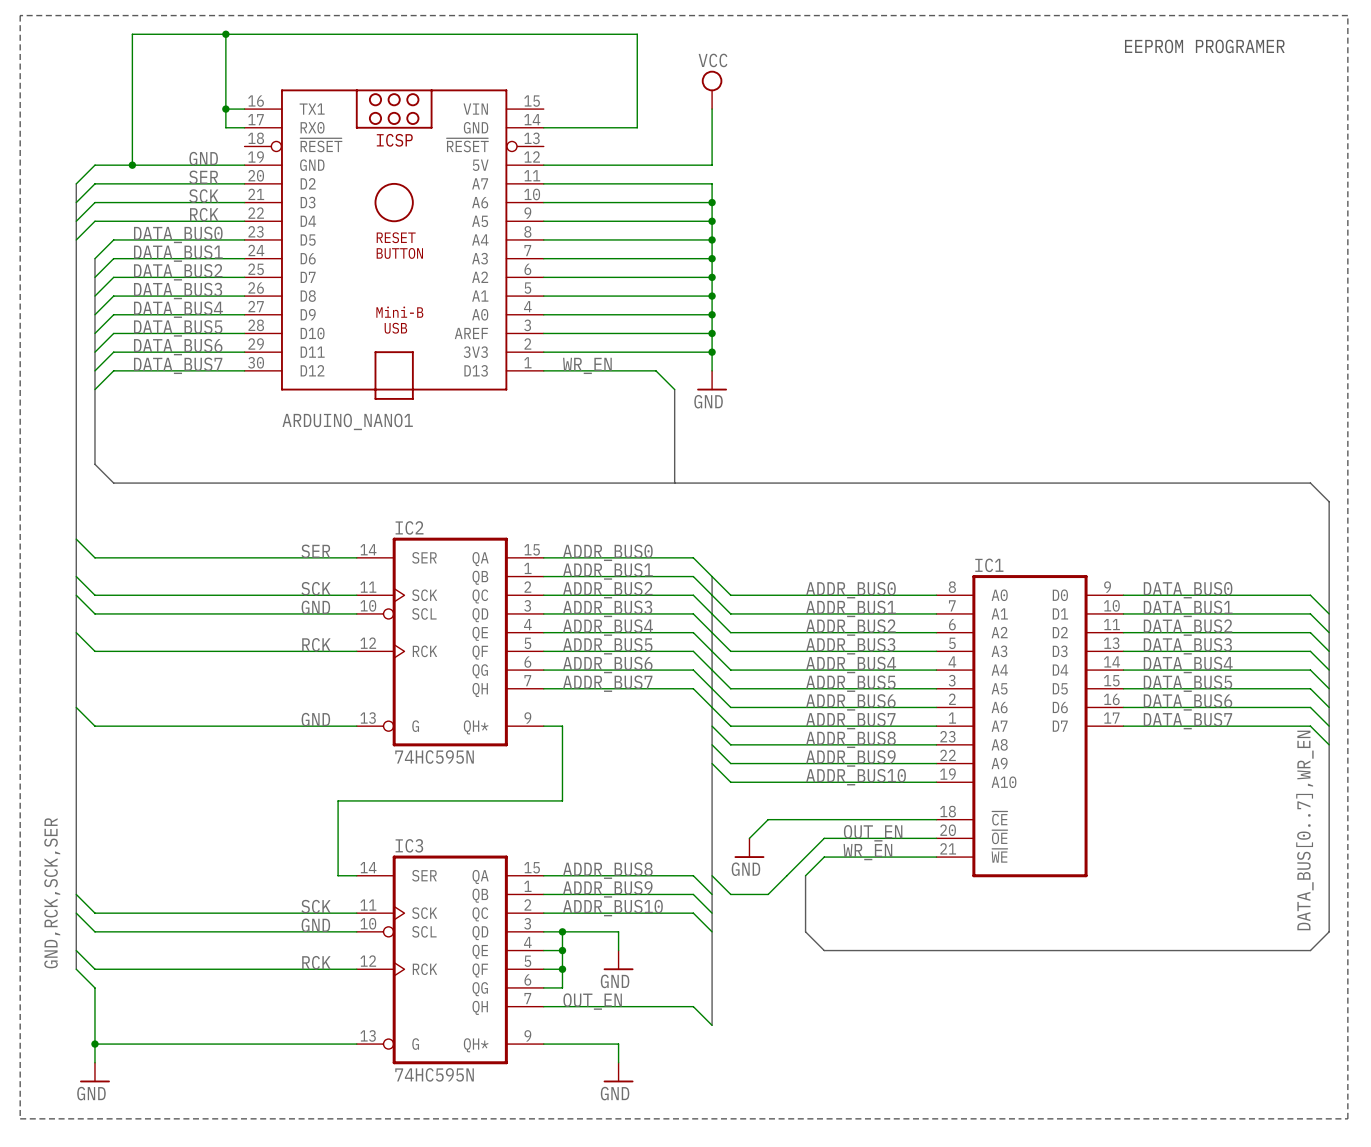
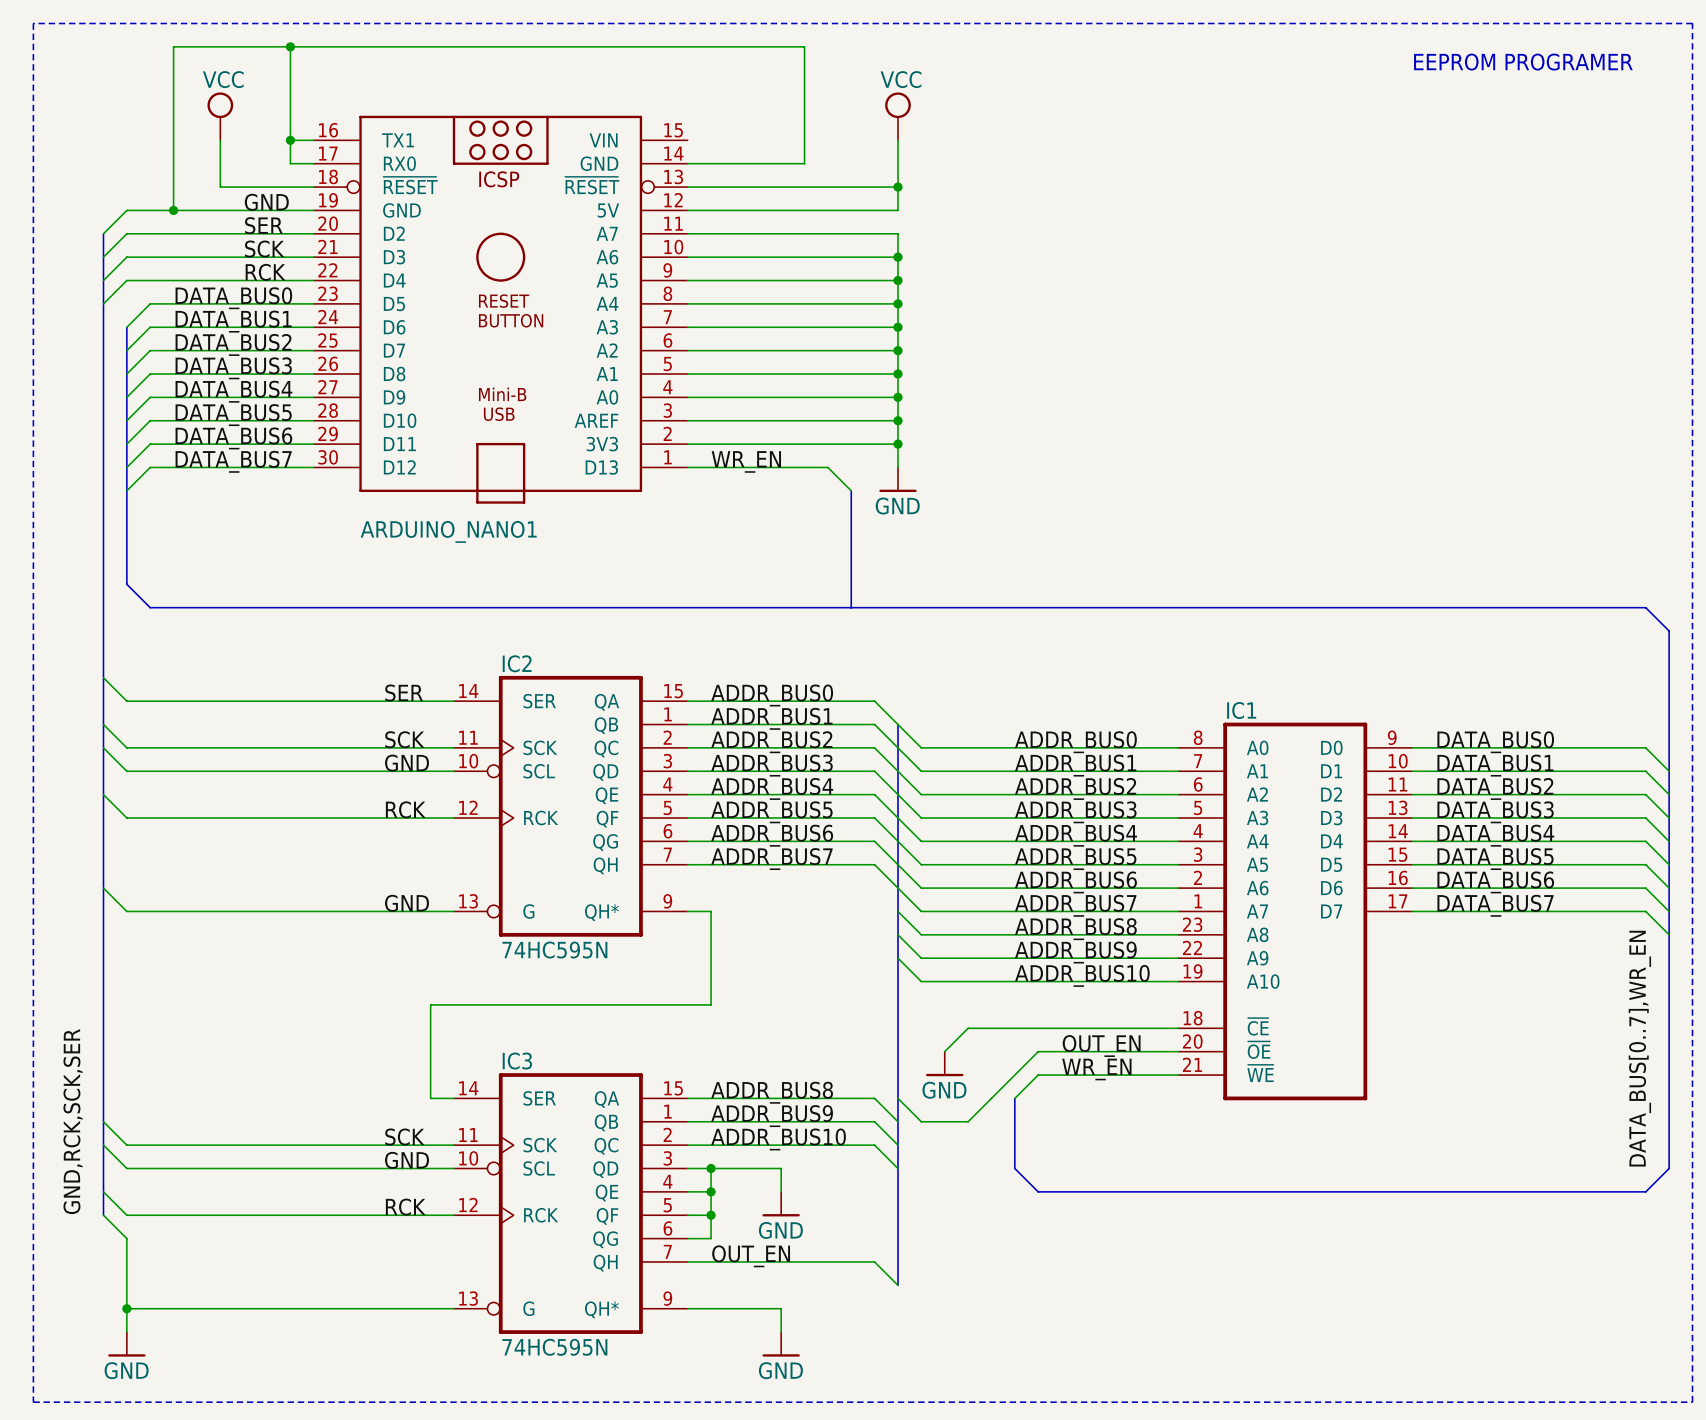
power symbol: none -> VCC (220, 116)
wire: none -> (220, 140) (220, 187) (313, 187)
wire: none -> (687, 187) (897, 187)
junction: none -> (897, 187)

